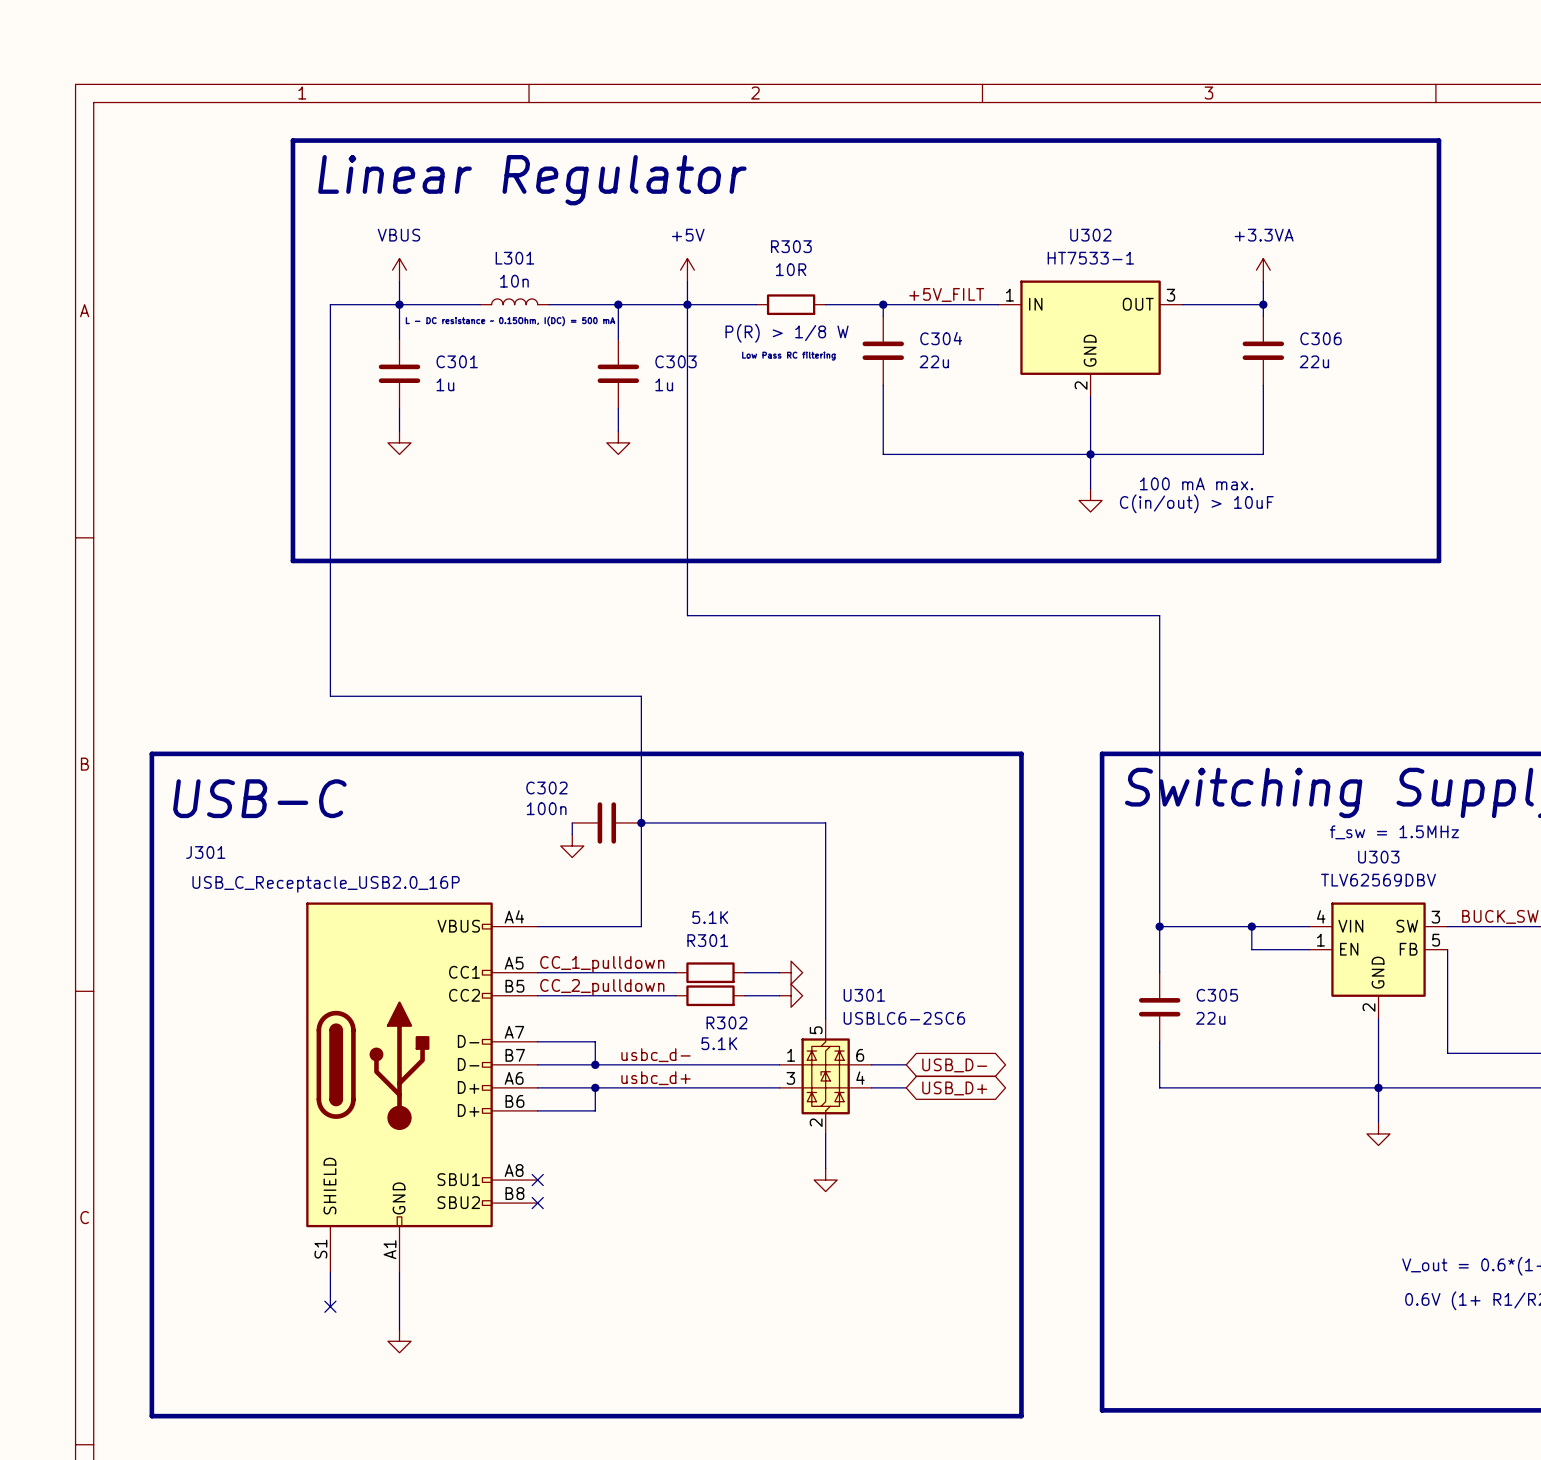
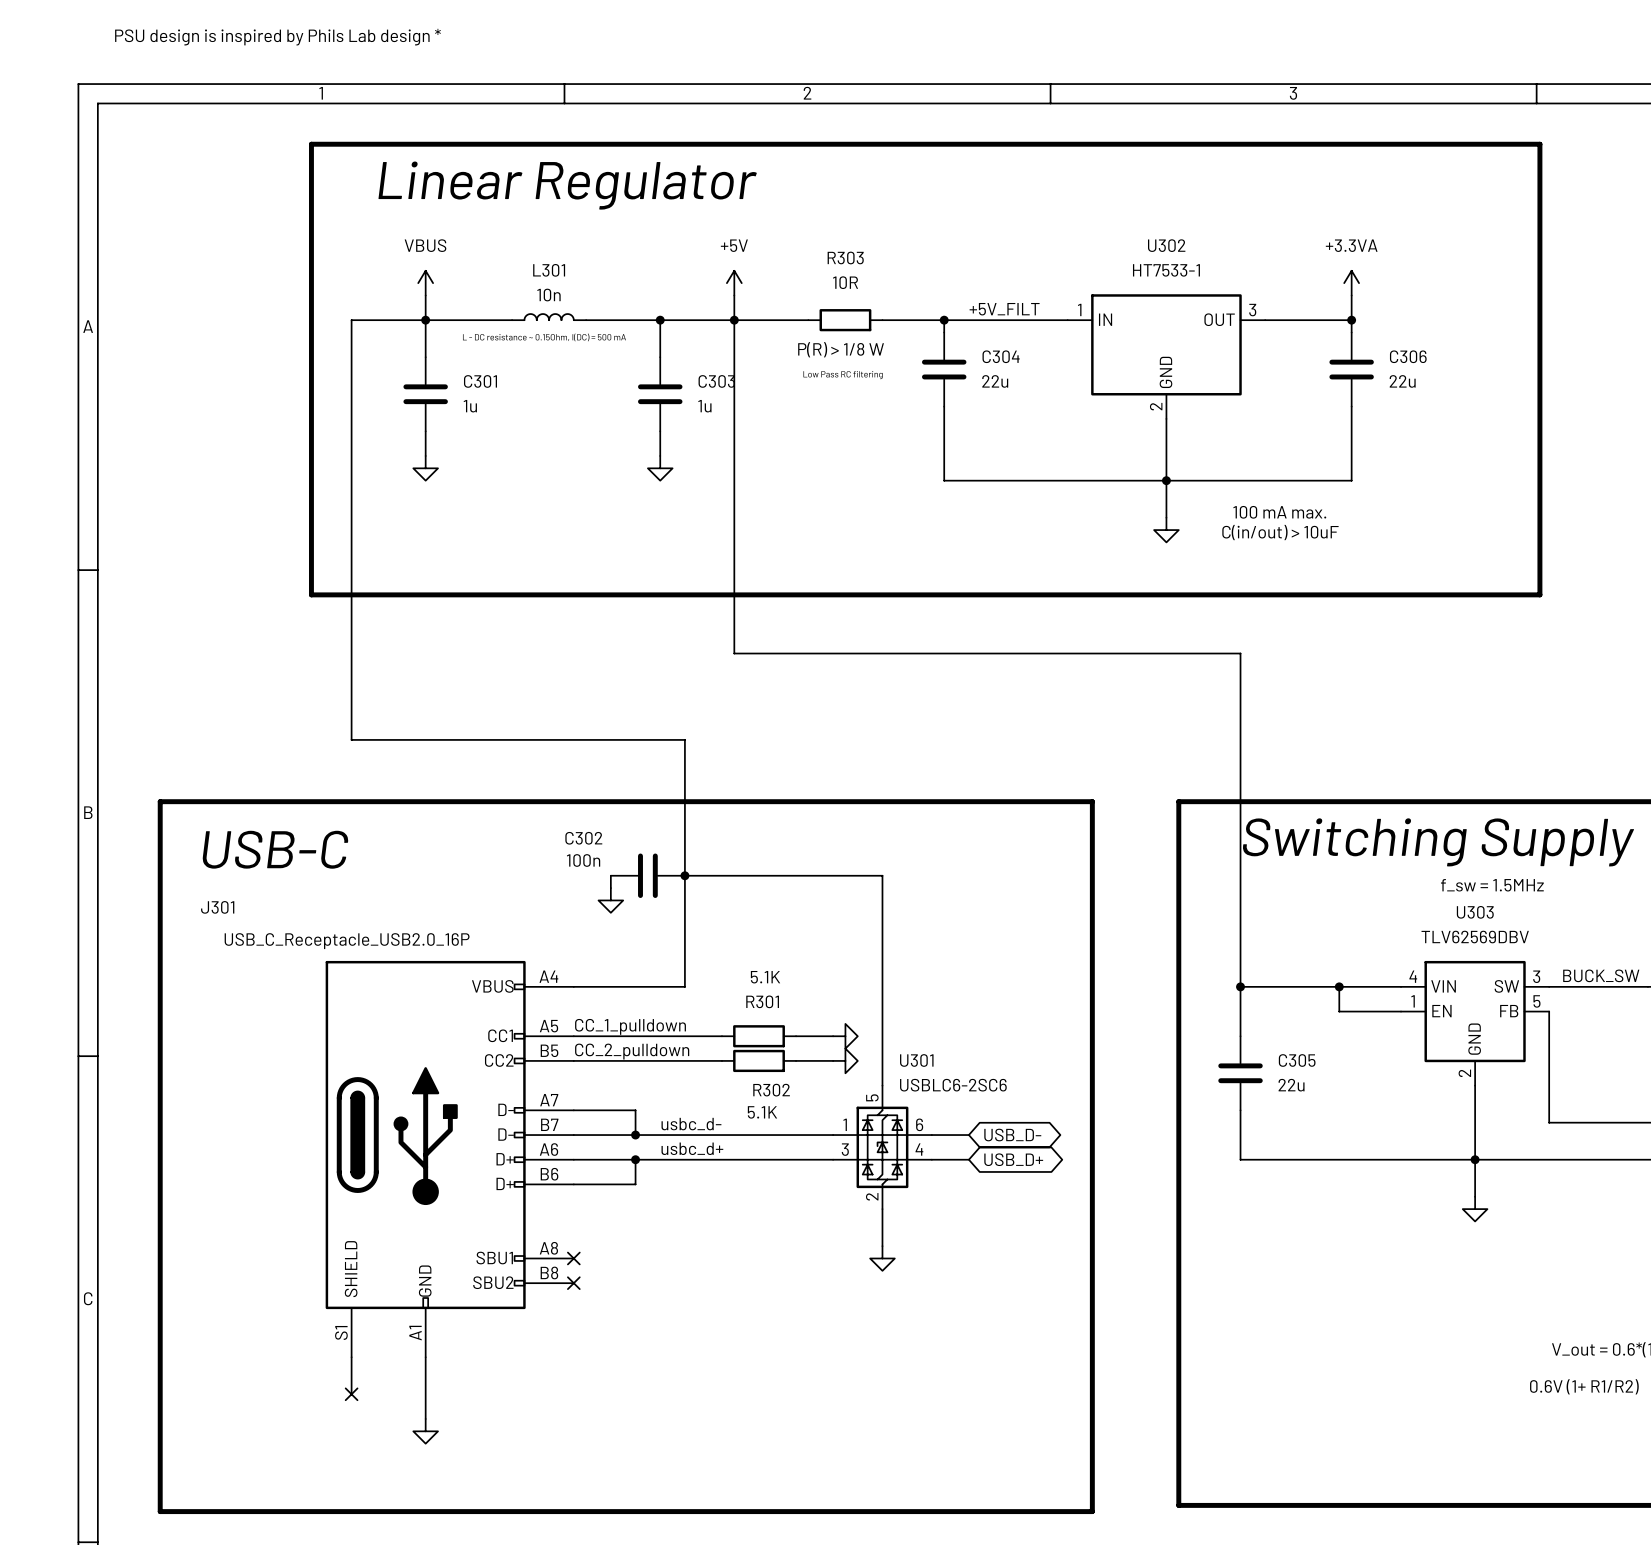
text: none -> PSU design is inspired by Phils Lab design * (278, 37)

